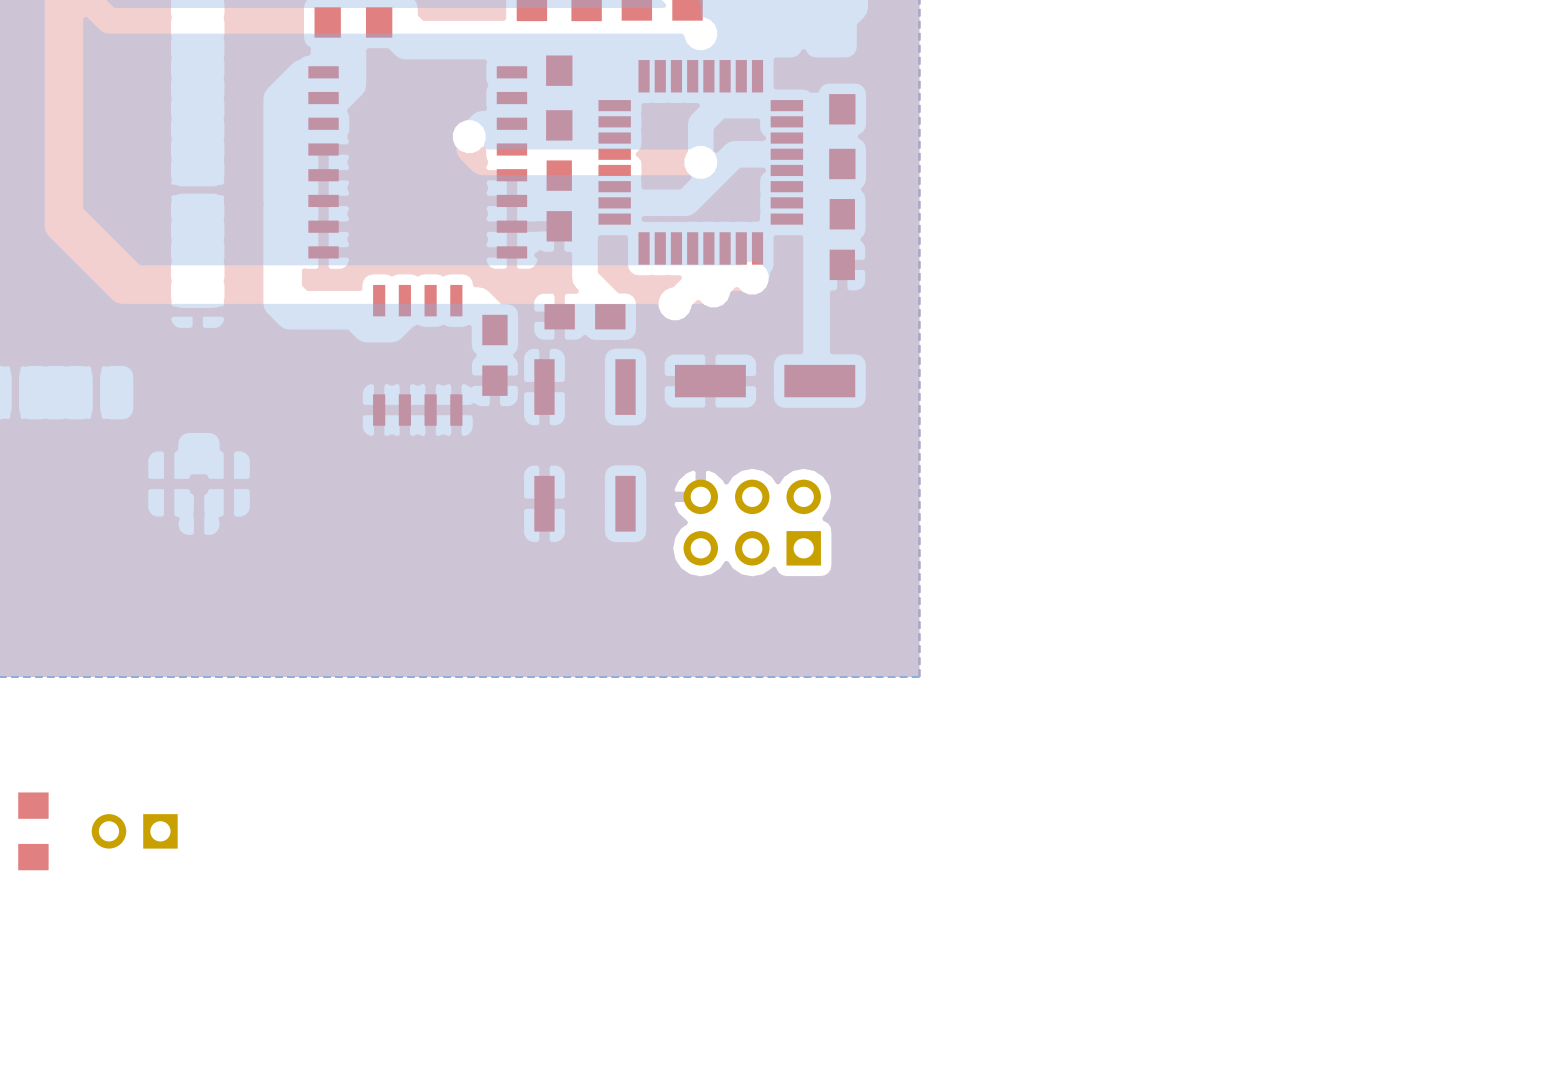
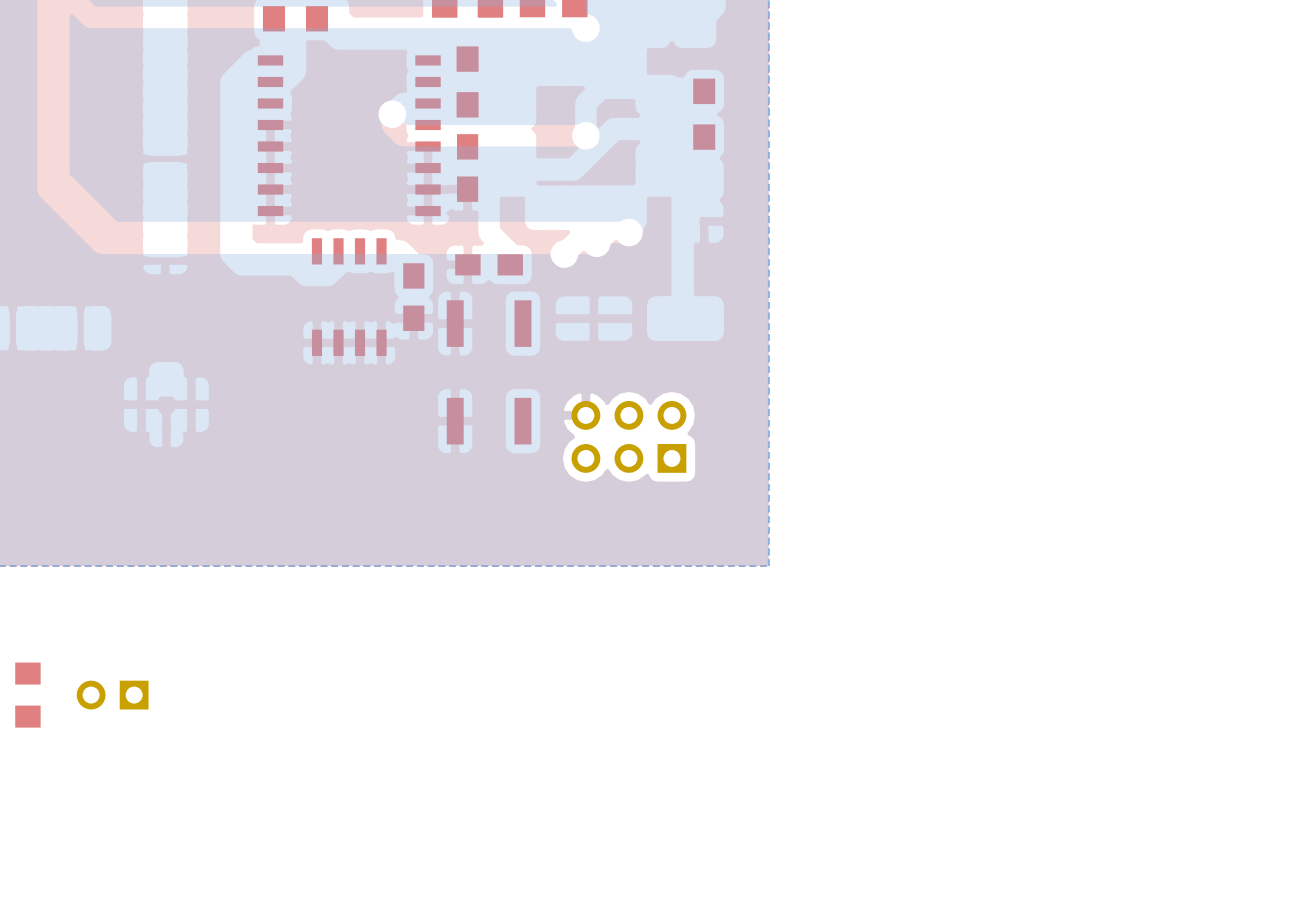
part: (700, 162) -> none
part: (842, 239) -> none
part: (765, 381) -> none

